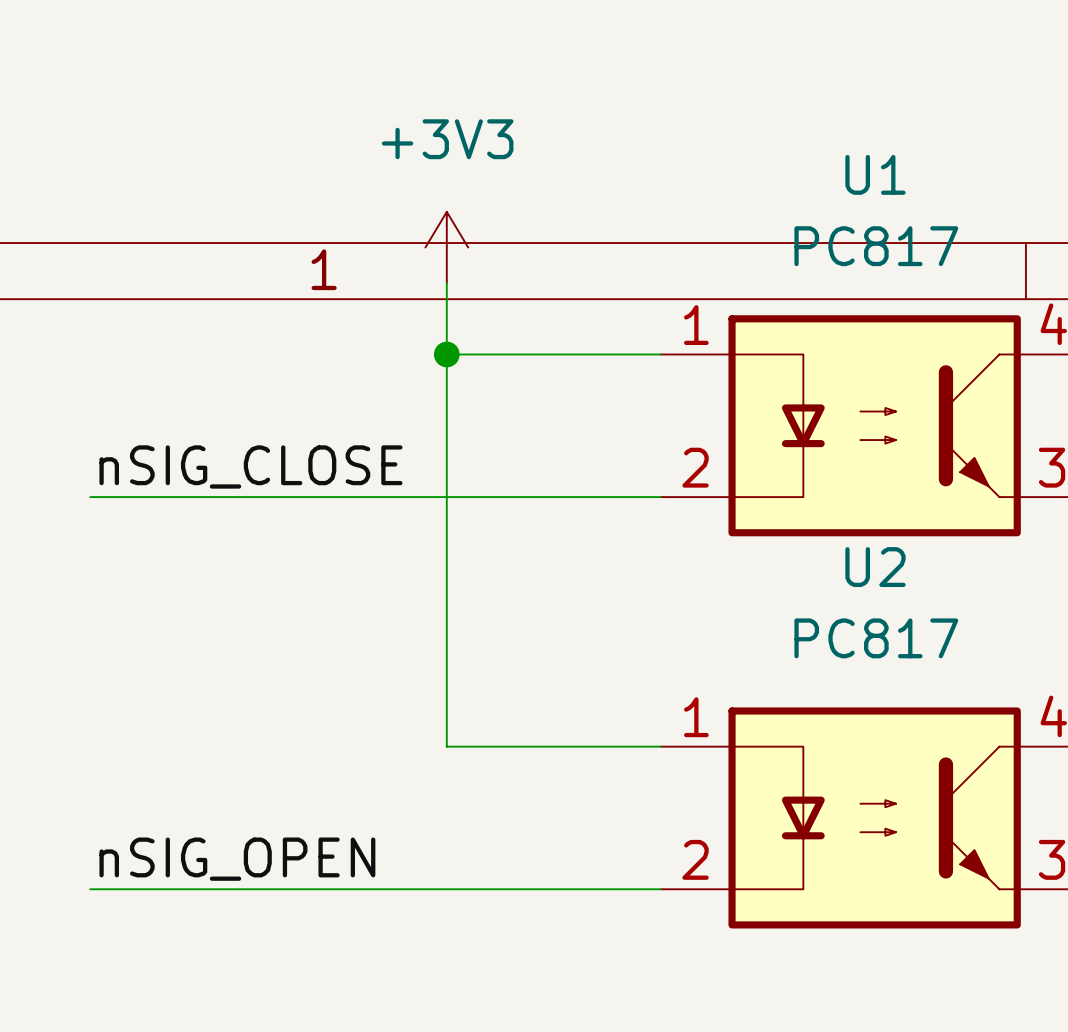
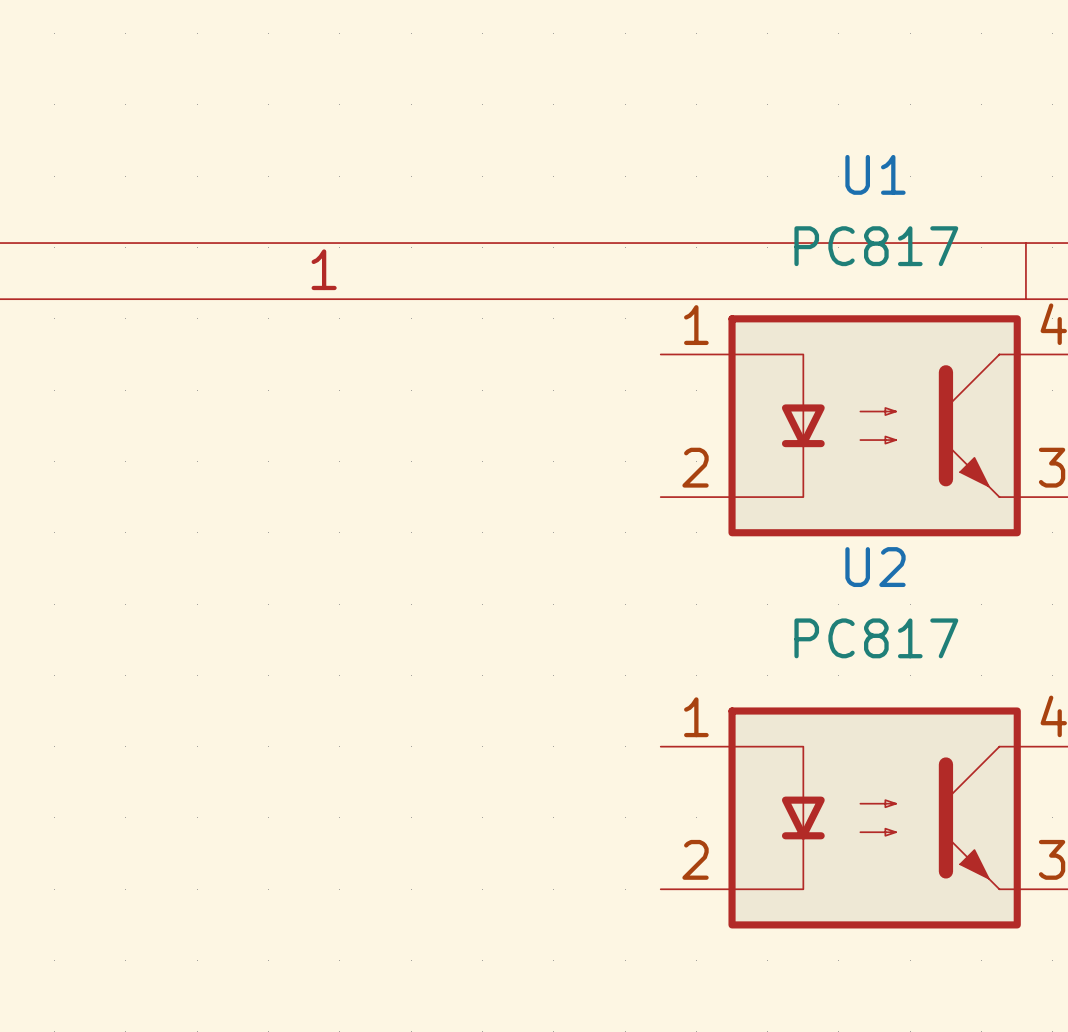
power symbol: +3V3 (446, 247) -> none
wire: (446, 283) (446, 746) (660, 746) -> none
wire: (446, 354) (660, 354) -> none
junction: (446, 354) -> none
label: nSIG_CLOSE (250, 466) -> none
wire: (90, 497) (660, 497) -> none
label: nSIG_OPEN (237, 859) -> none
wire: (90, 889) (660, 889) -> none

